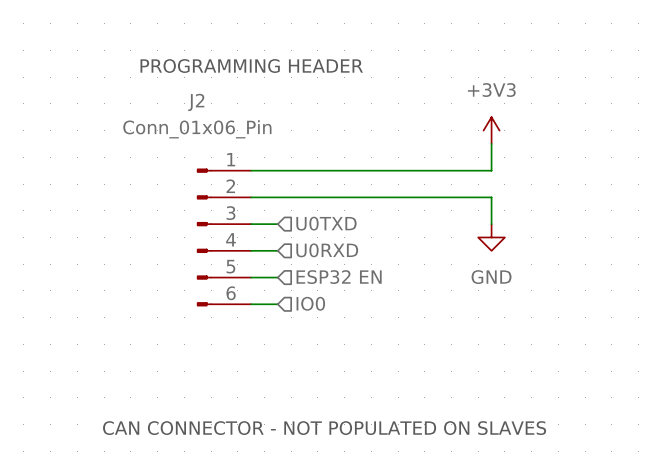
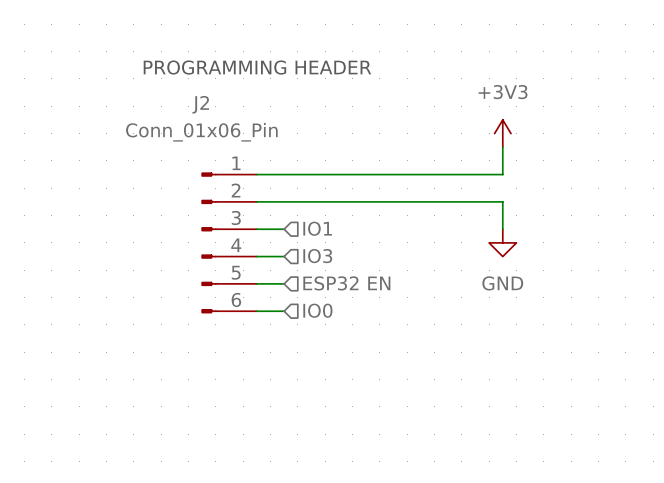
hierarchical label: U0TXD (326, 223) -> IO1 (317, 228)
hierarchical label: U0RXD (327, 250) -> IO3 (317, 256)
text: CAN CONNECTOR - NOT POPULATED ON SLAVES (324, 428) -> none

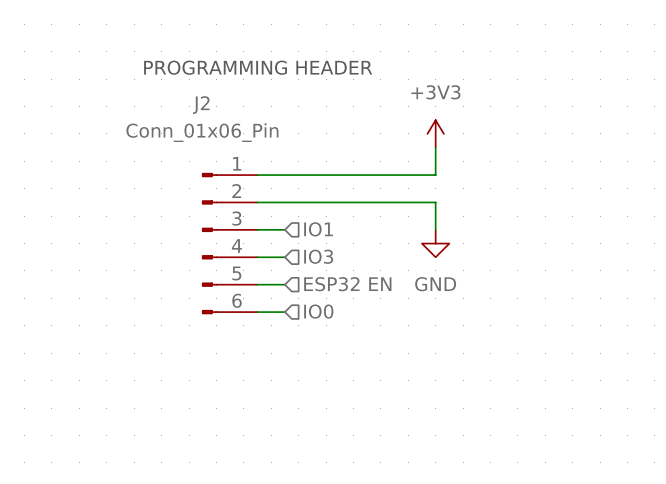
power symbol position: +3V3 (502, 133) -> +3V3 (435, 133)
wire: (502, 147) (502, 174) (434, 174) -> (435, 147) (435, 175)
wire: (434, 201) (502, 201) (502, 229) -> (435, 202) (435, 229)
power symbol position: GND (502, 242) -> GND (435, 243)

